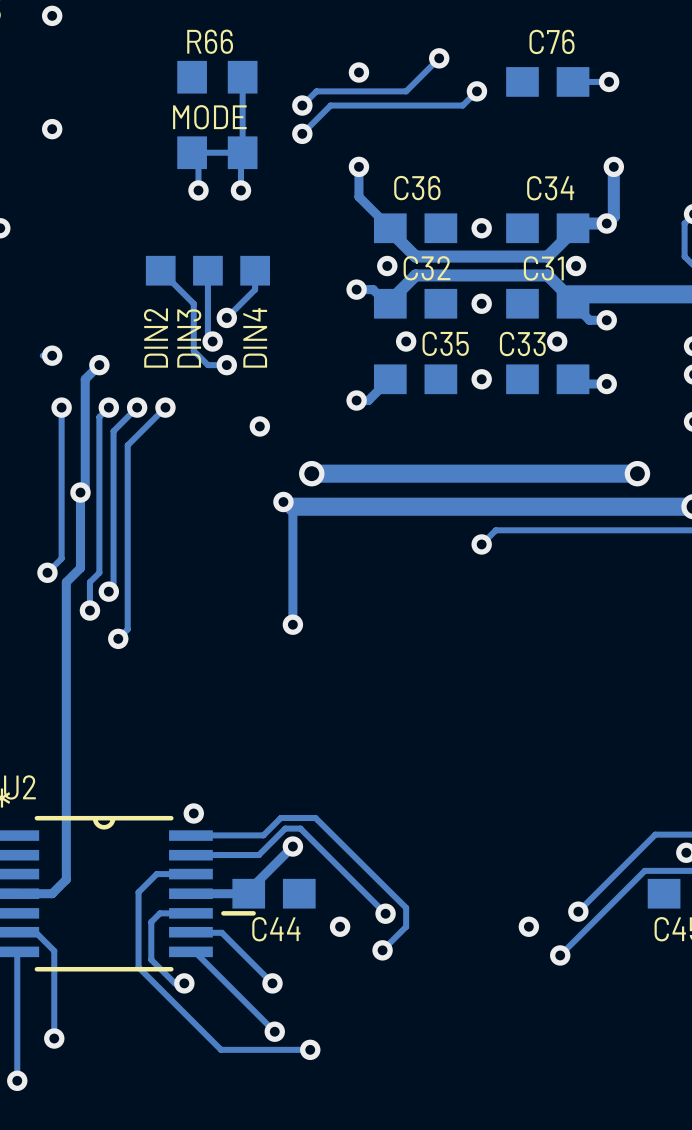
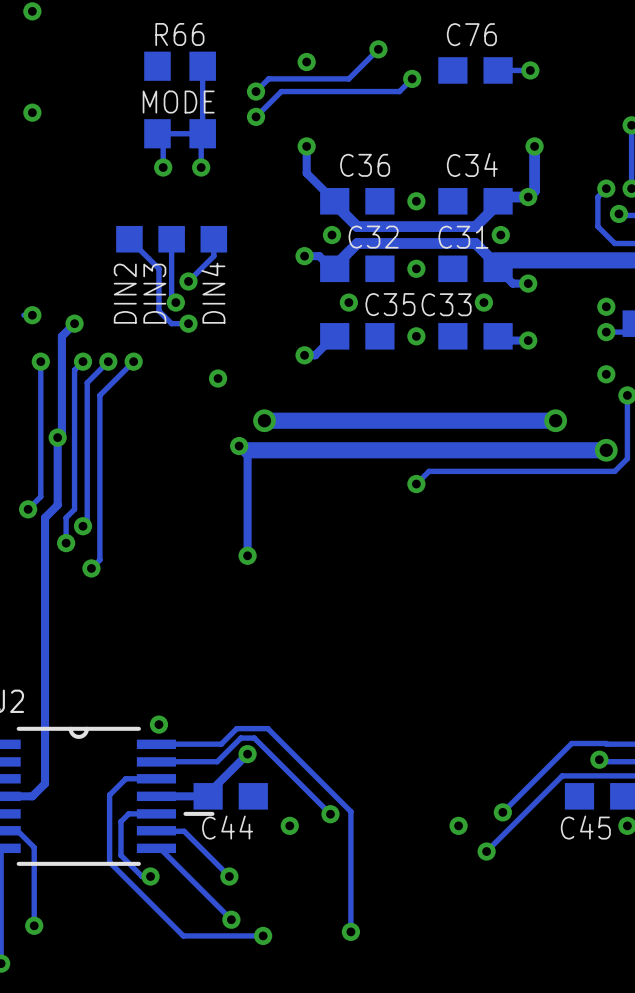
track: (315, 818) (406, 907) (406, 926) (382, 950) -> (267, 728) (350, 811) (350, 931)
via position: (382, 950) -> (350, 931)

